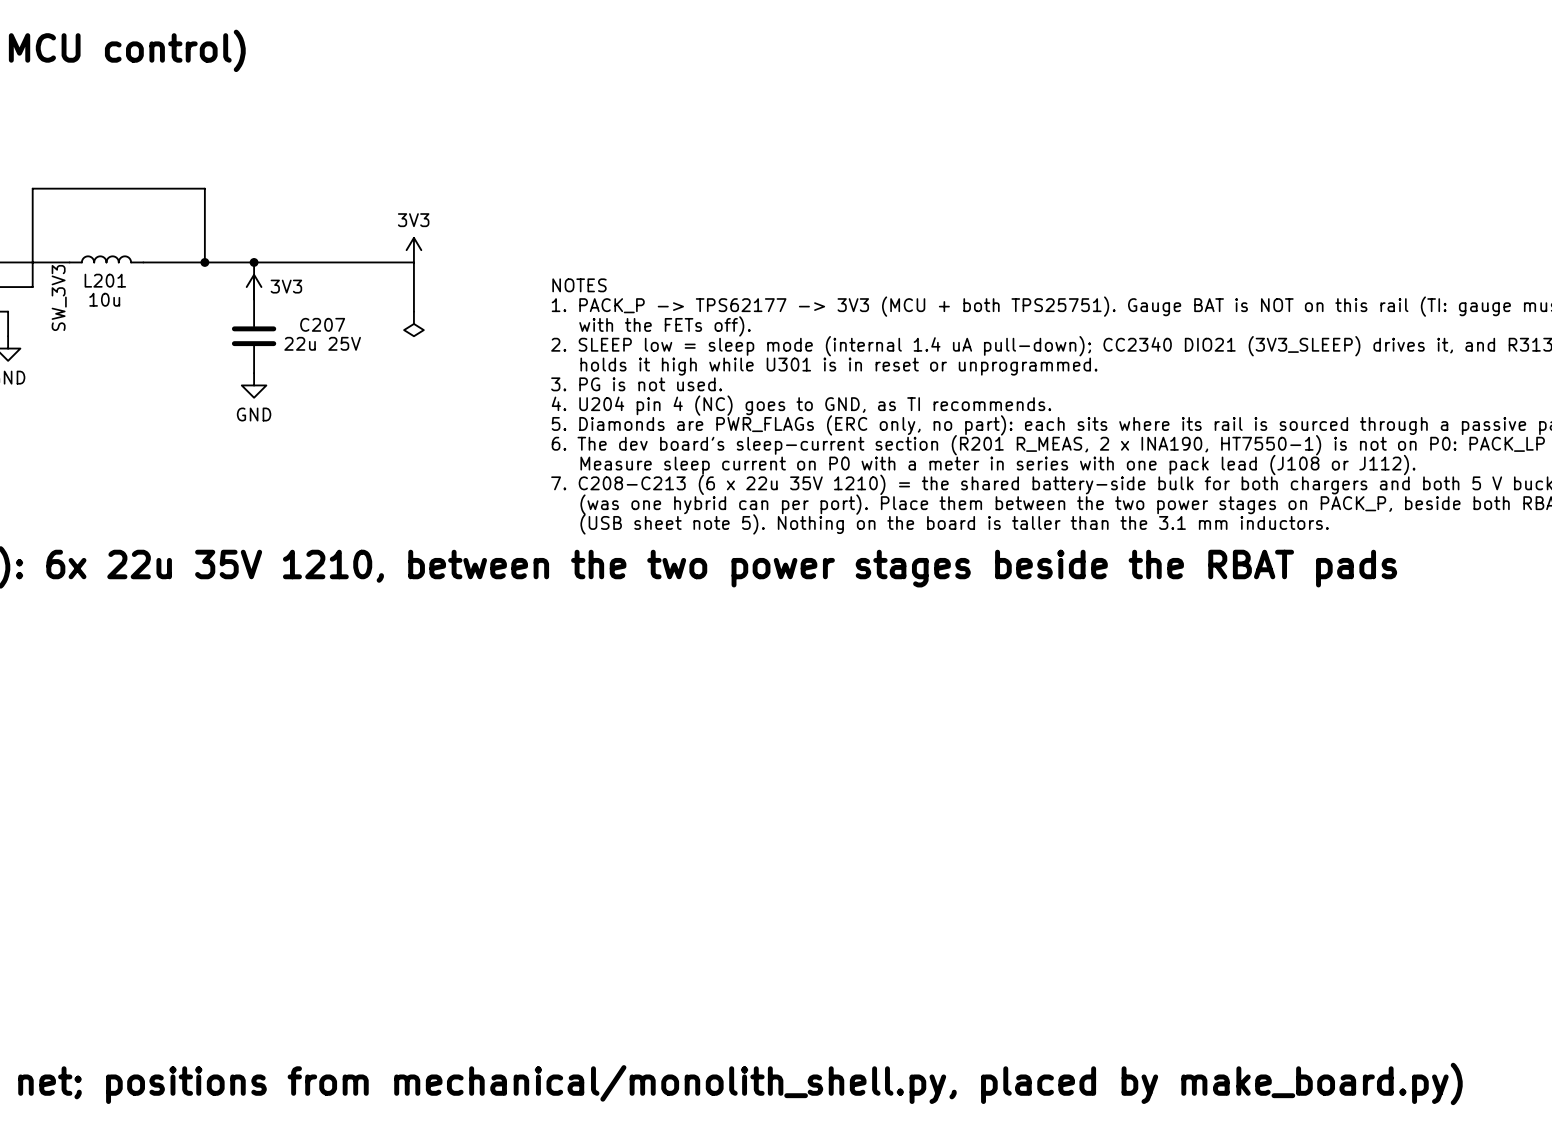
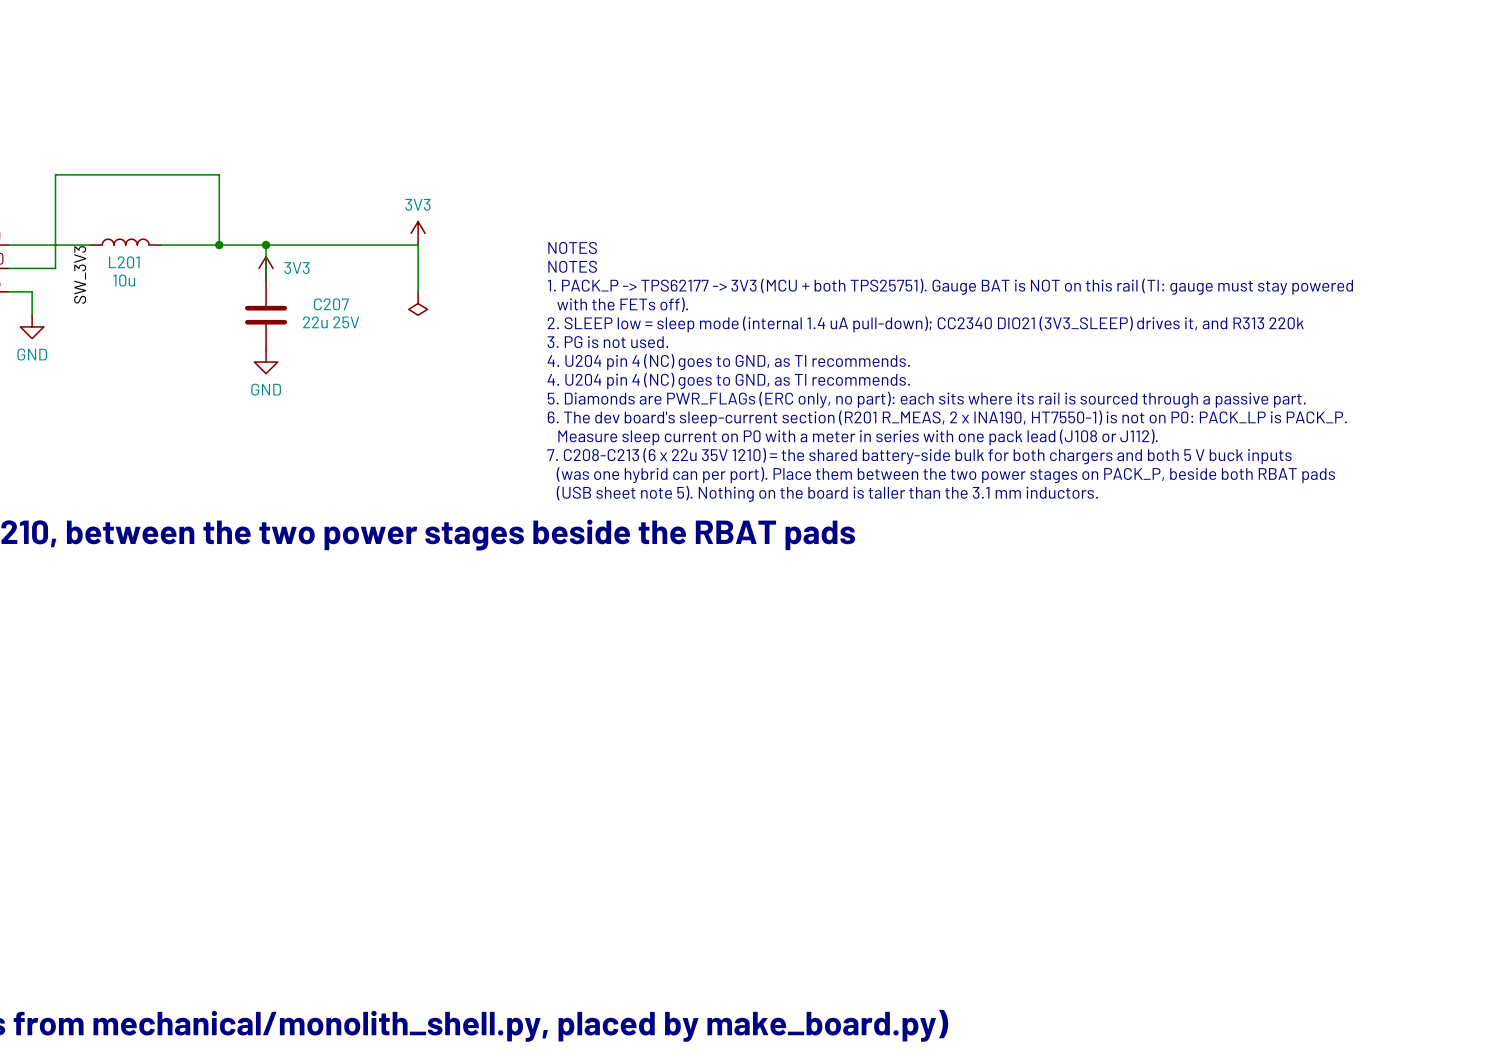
text: none -> NOTES (572, 247)
text: holds it high while U301 is in reset or unprogrammed. (838, 366) -> 3. PG is not used. (607, 342)
text: 3. PG is not used. (636, 384) -> 4. U204 pin 4 (NC) goes to GND, as TI recommends. (728, 362)

